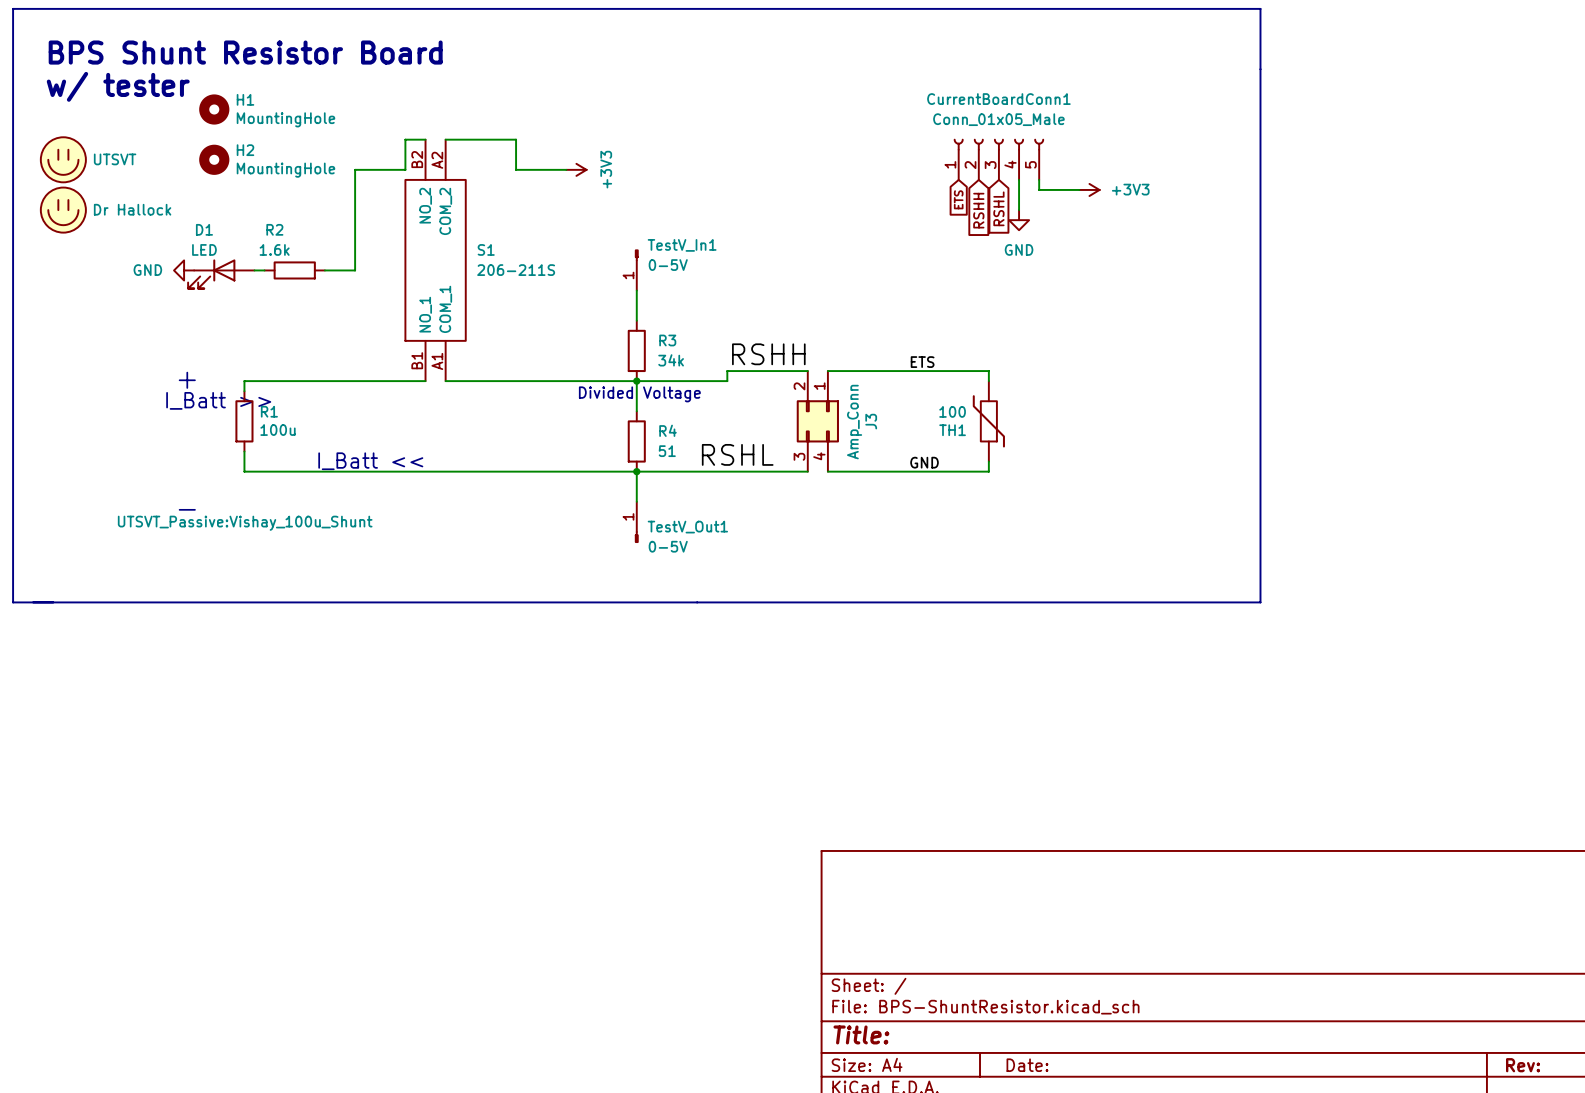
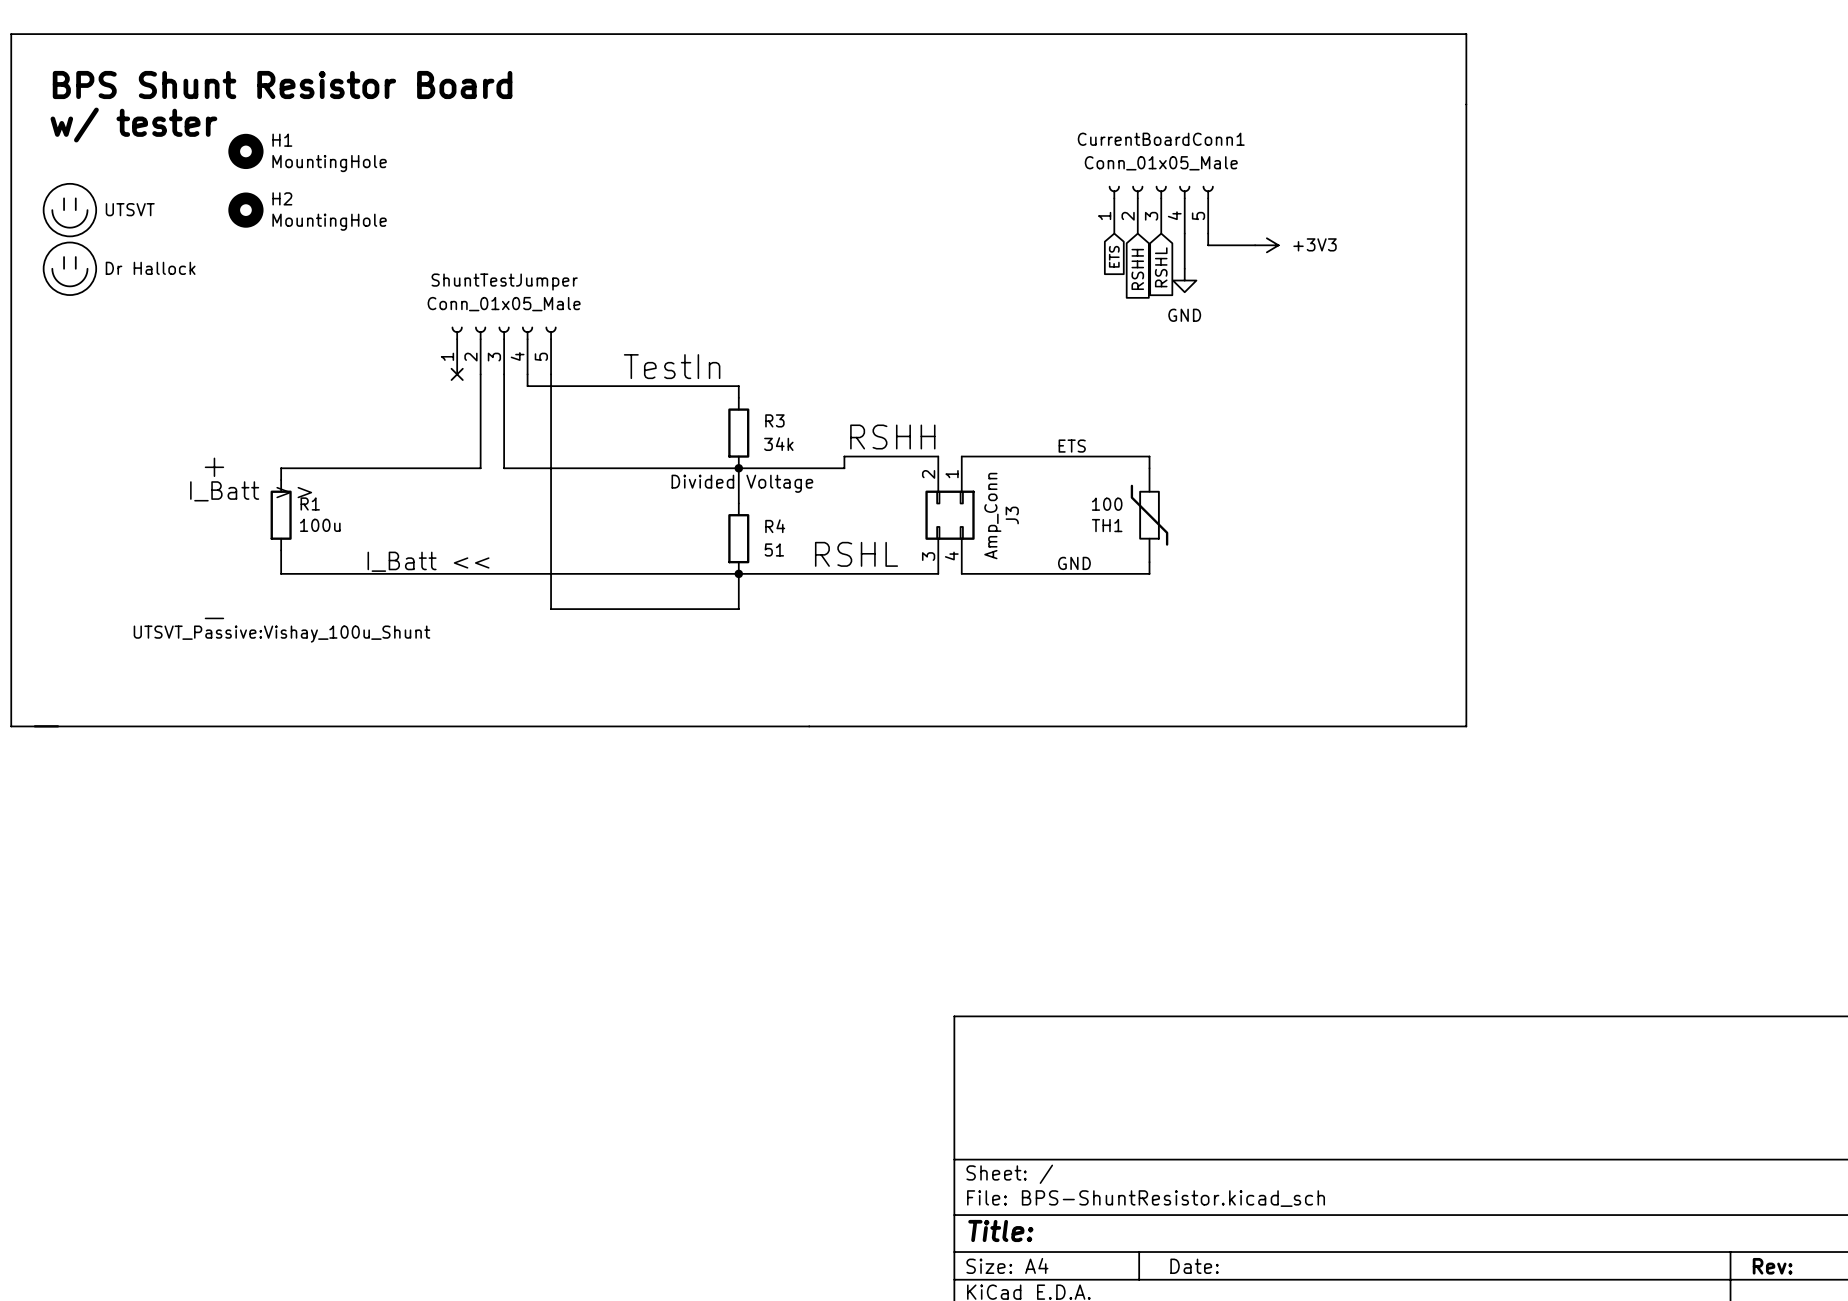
wire: (425, 139) (405, 139) (405, 169) (355, 169) (355, 270) (324, 270) -> none
wire: (445, 139) (516, 139) (516, 169) (566, 169) -> none
power symbol: +3V3 (576, 169) -> none
S1: 206-211S (435, 260) -> none
power symbol: GND (184, 270) -> none
wire: (254, 270) (264, 270) -> none
R2: 1.6k (294, 270) -> none
TestV_In1: 0-5V (636, 270) -> none
D1: LED (221, 273) -> none
ShuntTestJumper: none -> Conn_01x05_Male (504, 350)
wire: (636, 290) (636, 310) -> (527, 374) (527, 386) (738, 386)
label: none -> TestIn (672, 366)
no-connect mark: none -> (457, 374)
wire: none -> (504, 374) (504, 468) (515, 468)
wire: none -> (551, 374) (551, 609) (738, 609)
wire: (415, 381) (425, 381) -> (480, 468) (480, 374)
TestV_Out1: 0-5V (636, 522) -> none

